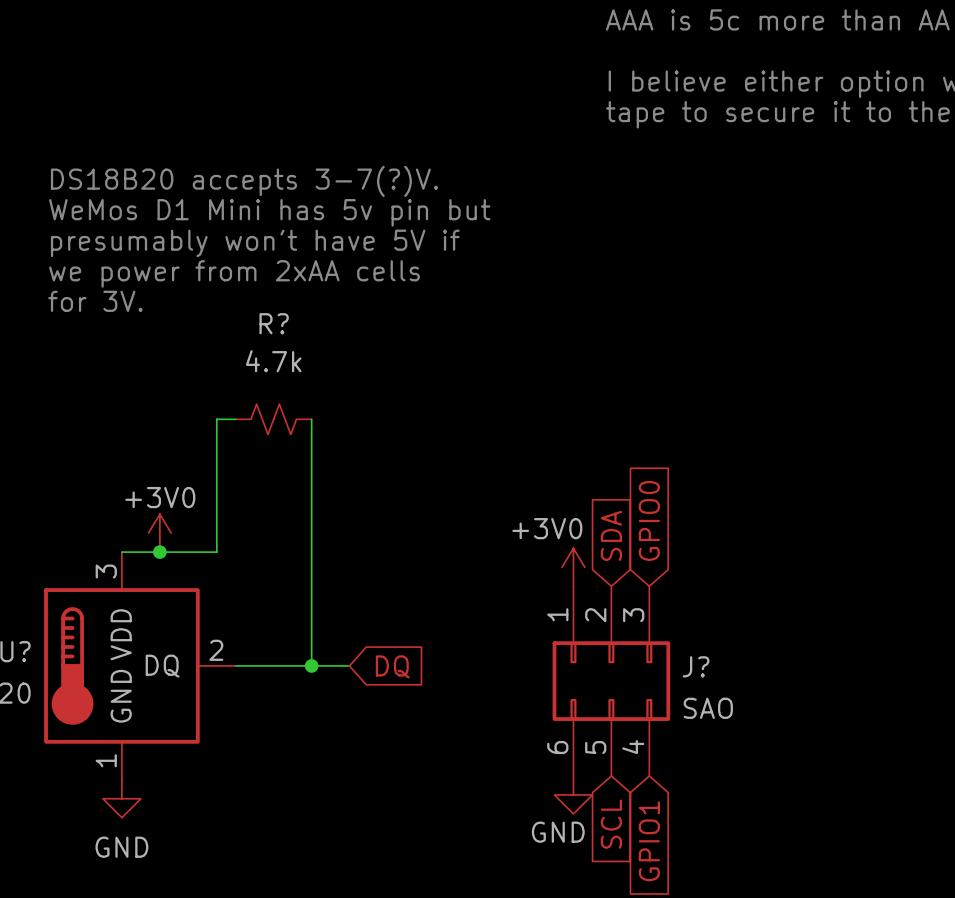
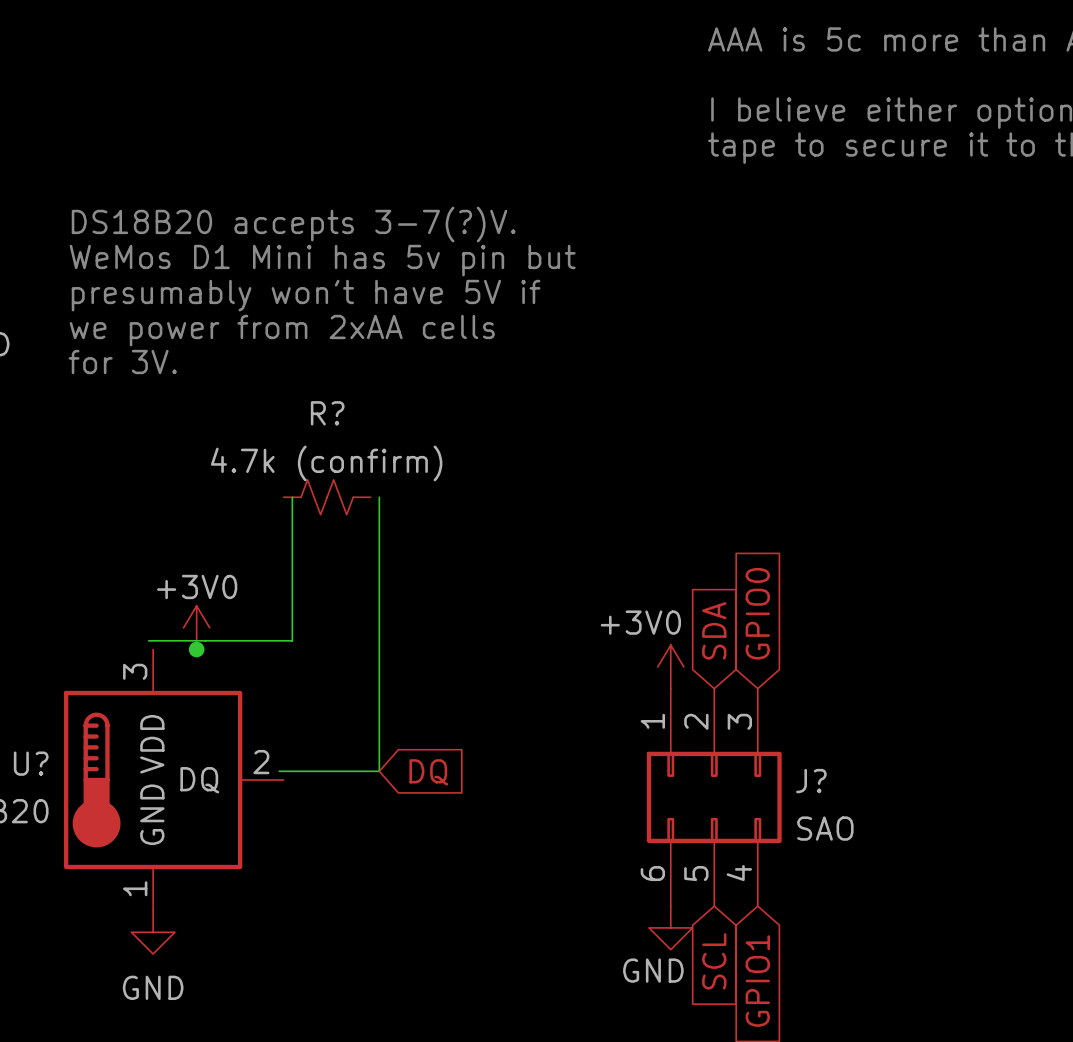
R? name position: R? (274, 323) -> R? (327, 413)
R? value: 4.7k (273, 361) -> 4.7k (confirm) (326, 463)
wire: (235, 419) (216, 419) (216, 552) (121, 552) -> none
wire: none -> (292, 497) (292, 640) (148, 640)
wire: (311, 419) (311, 665) -> none
wire: none -> (379, 497) (379, 771) (279, 771)
wire: (235, 665) (349, 665) -> none
junction: (311, 665) -> none
global label position: DQ (392, 666) -> DQ (428, 772)

